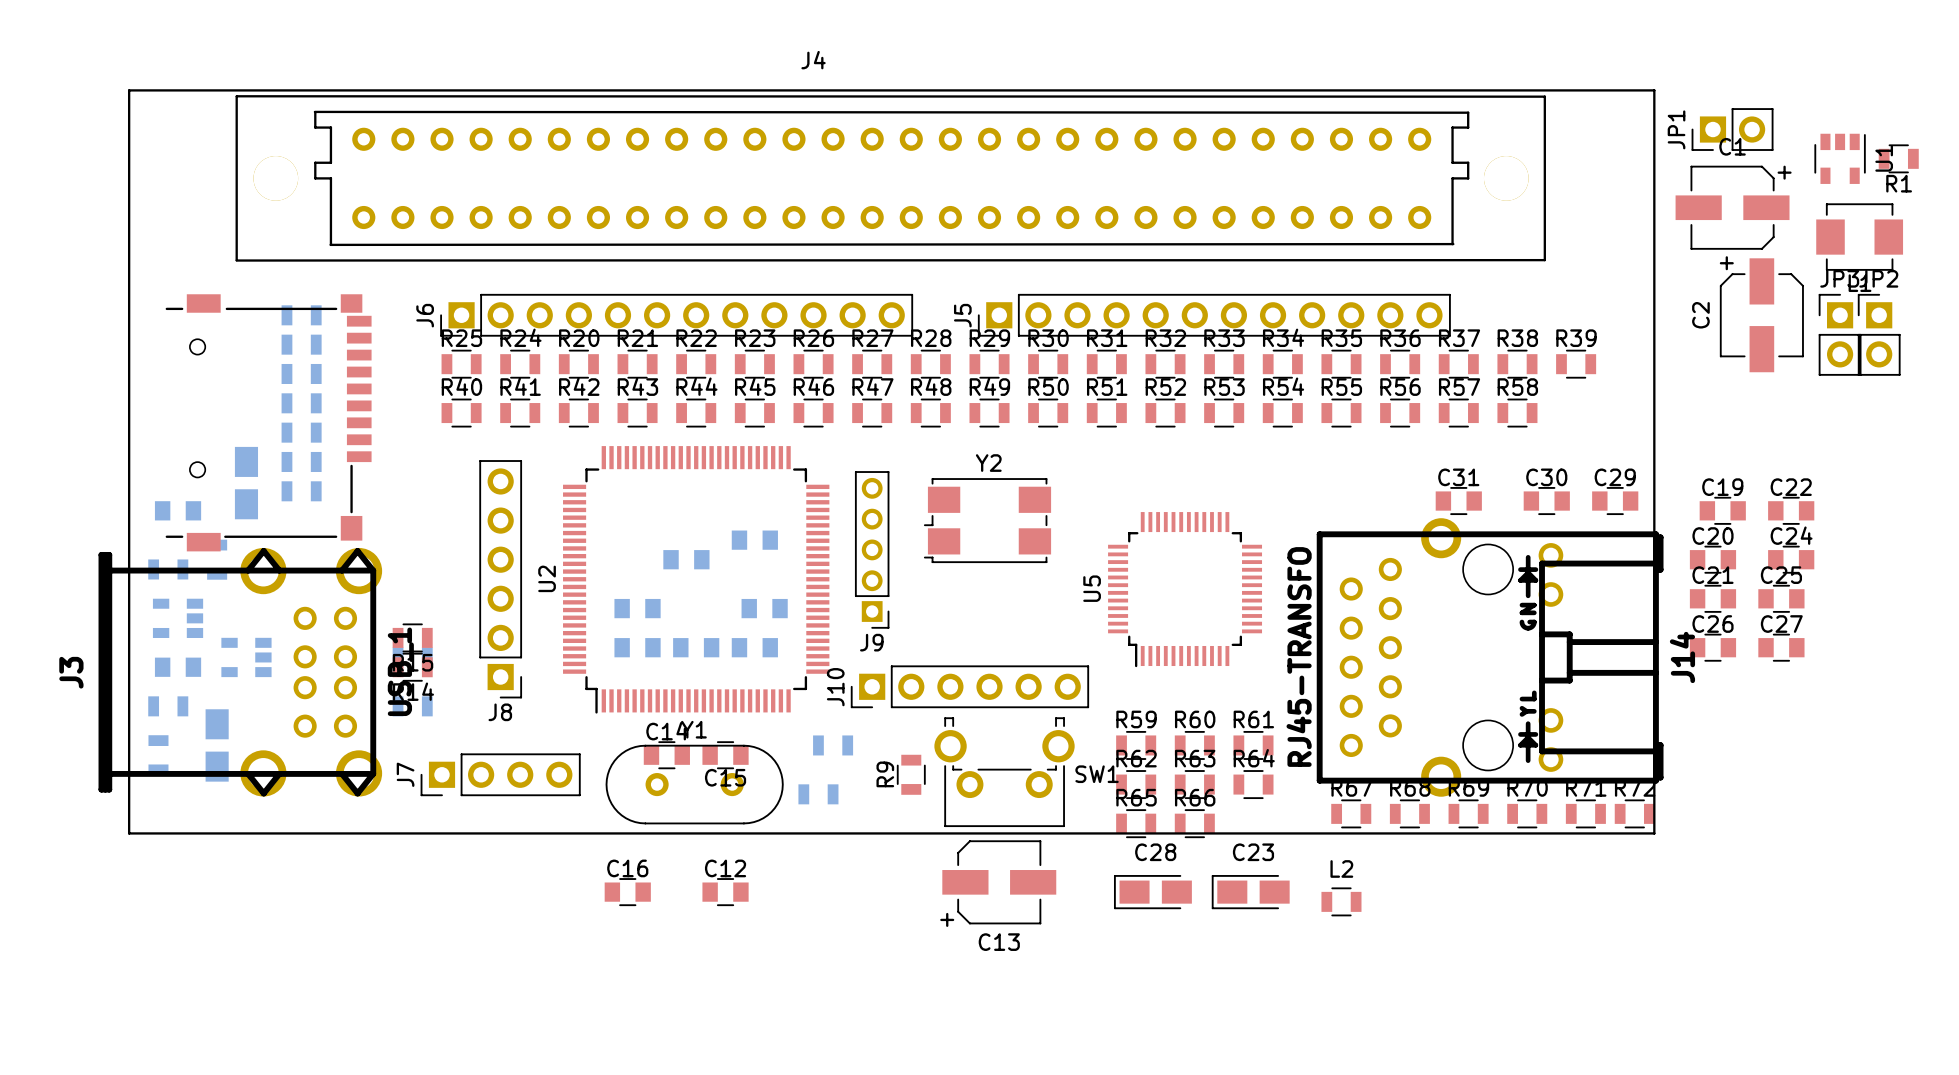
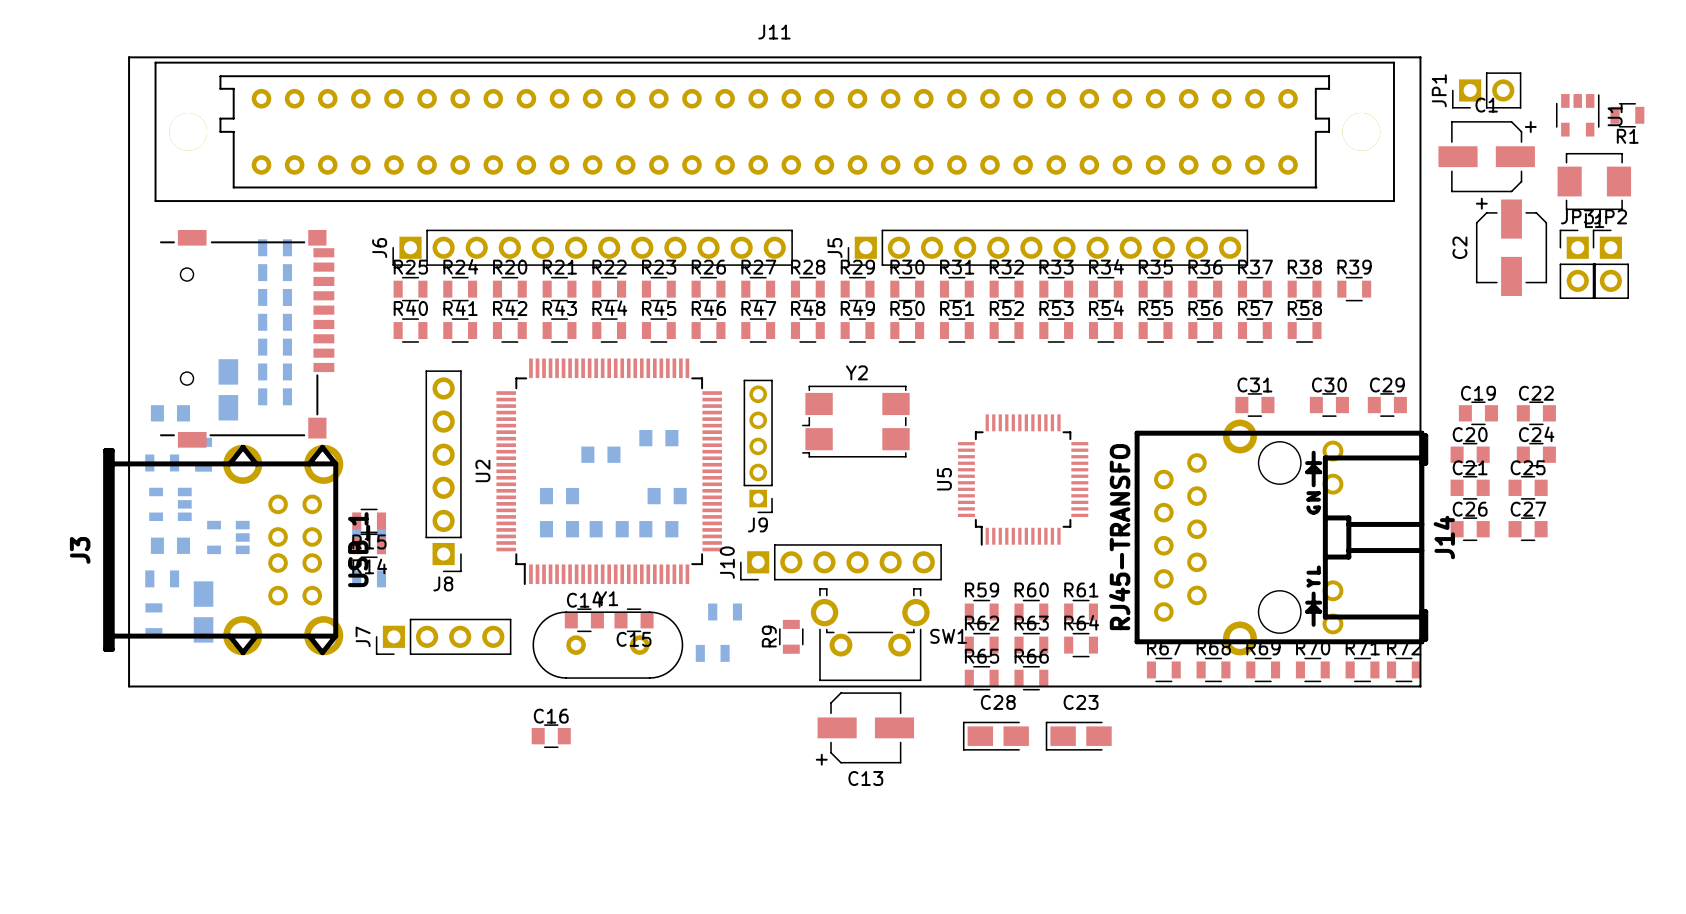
J4: (890, 178) -> none
J11: none -> (774, 131)
C12: (725, 892) -> none
L2: (1341, 901) -> none

